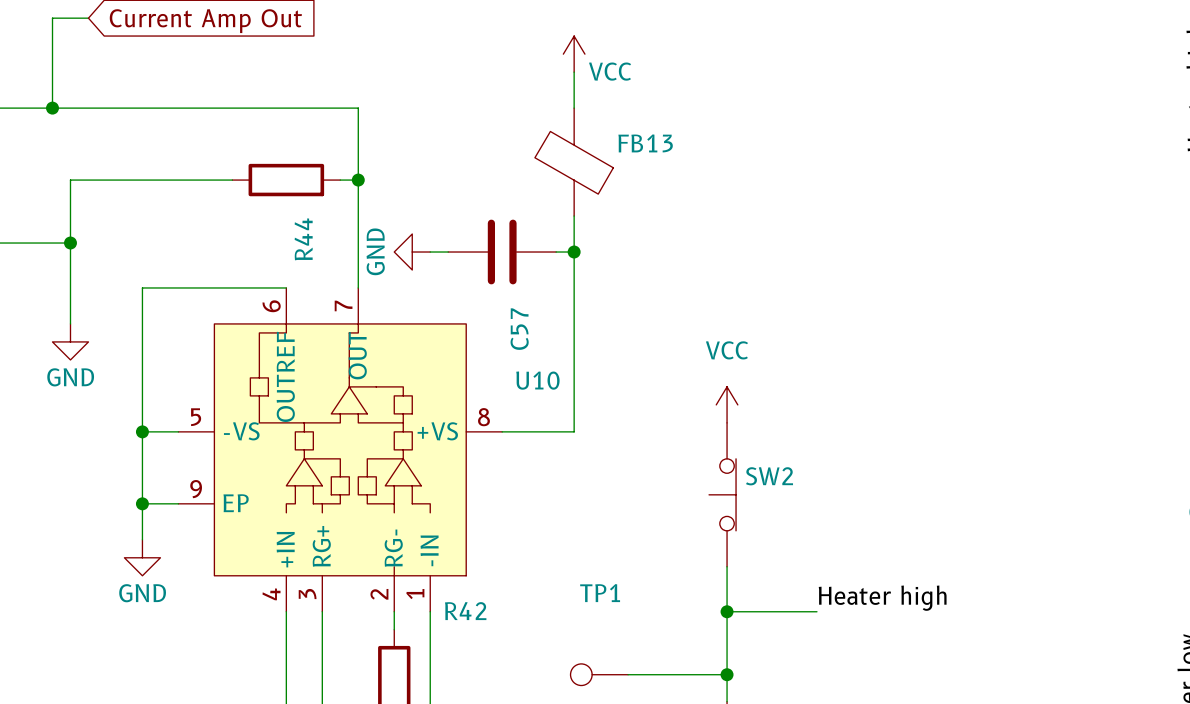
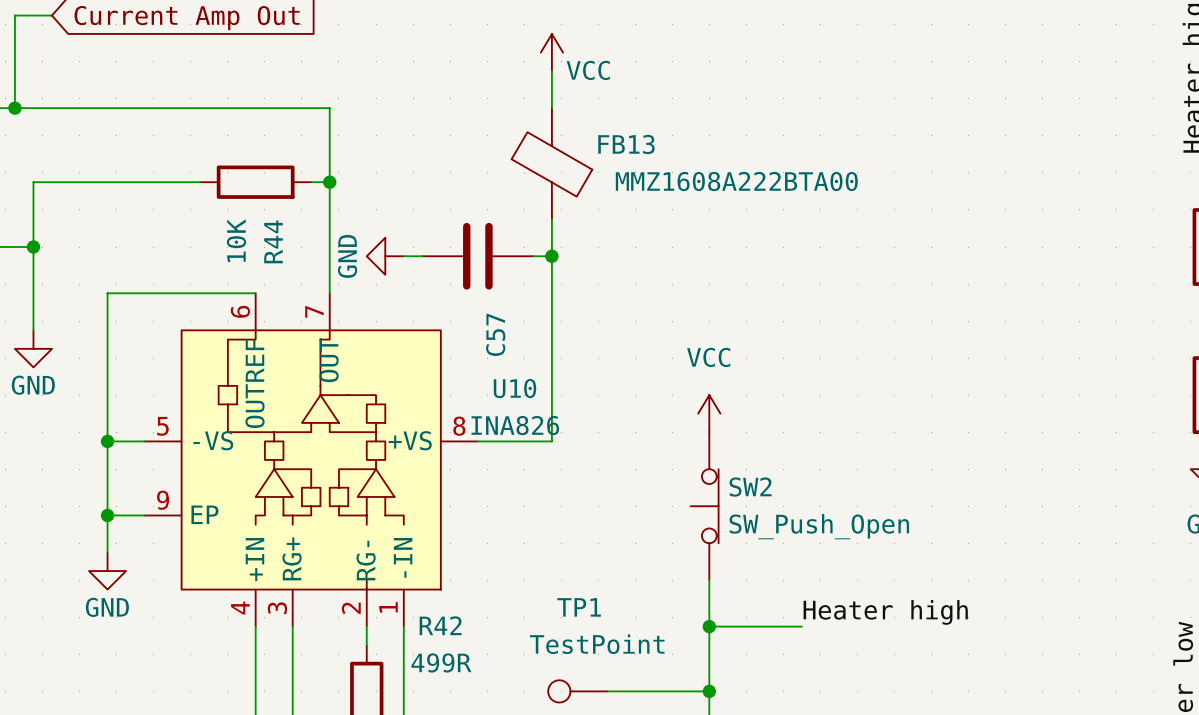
FB13 value: none -> MMZ1608A222BTA00 (736, 181)
R44 value: none -> 10K (236, 240)
U10 value: none -> INA826 (515, 425)
SW2 value: none -> SW_Push_Open (819, 526)
TP1 value: none -> TestPoint (597, 644)
R42 value: none -> 499R (441, 662)

